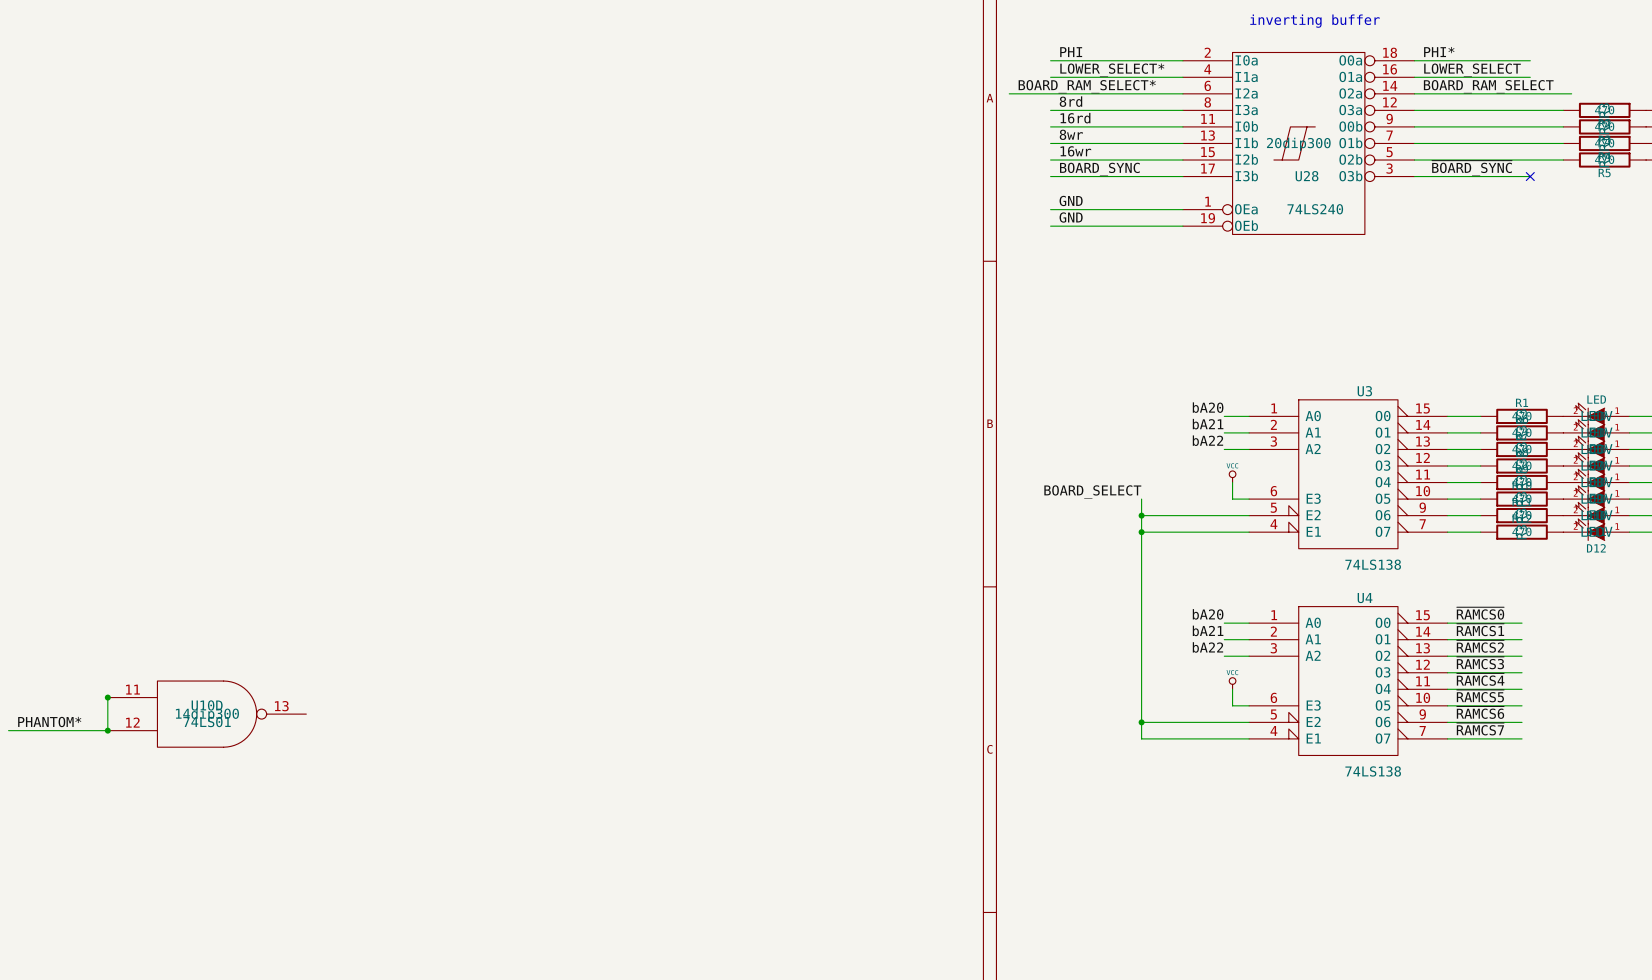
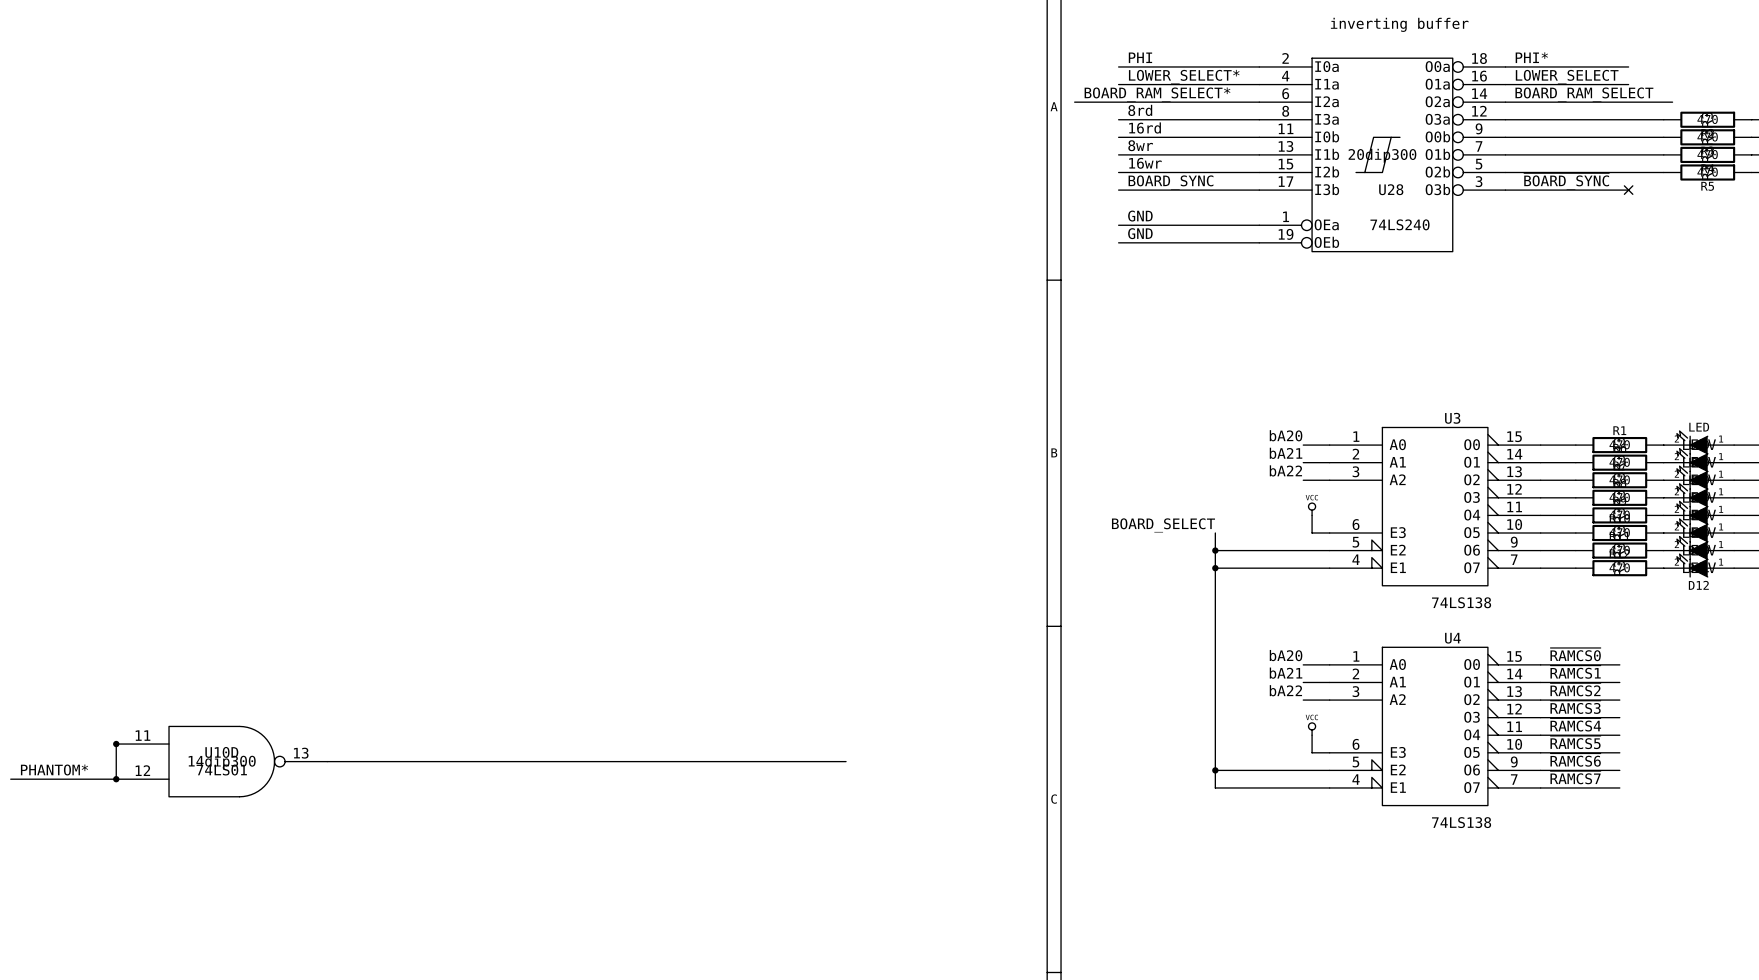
wire: none -> (327, 761) (846, 761)

